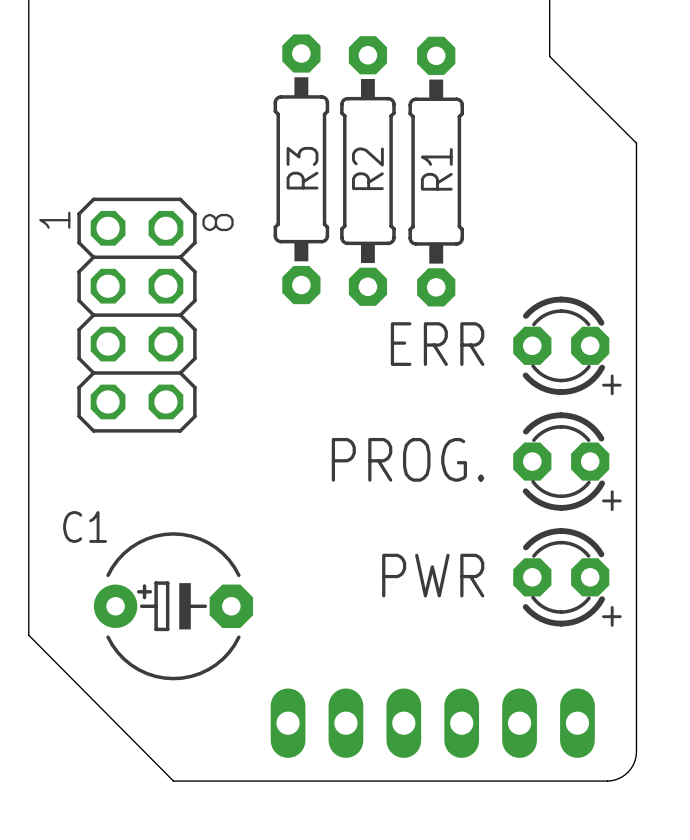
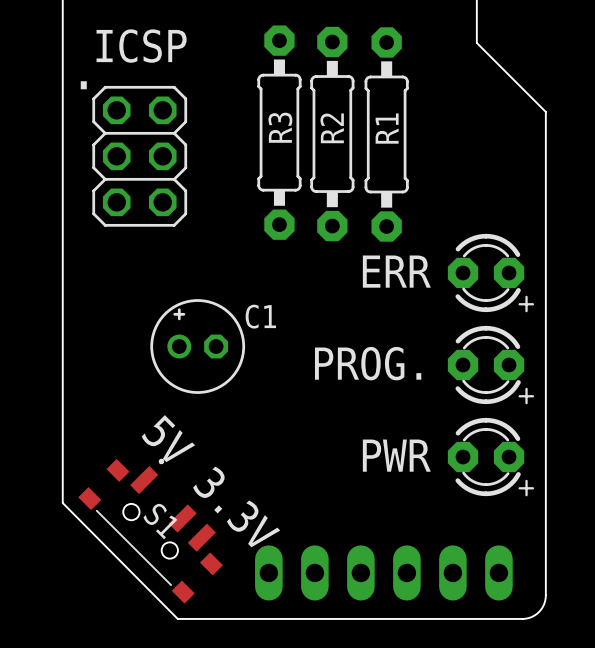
text: none -> ICSP (141, 46)
text: none -> . (83, 85)
part: none -> (139, 156)
text: 1 (54, 220) -> none
text: 8 (218, 222) -> none
part: (137, 315) -> none
C1 name position: C1 (85, 526) -> C1 (260, 316)
C1 footprint: [93, 532, 254, 681] -> [150, 299, 246, 394]
text: none -> 5V (168, 438)
text: none -> 3.3V (236, 506)
S1: none -> (150, 531)

